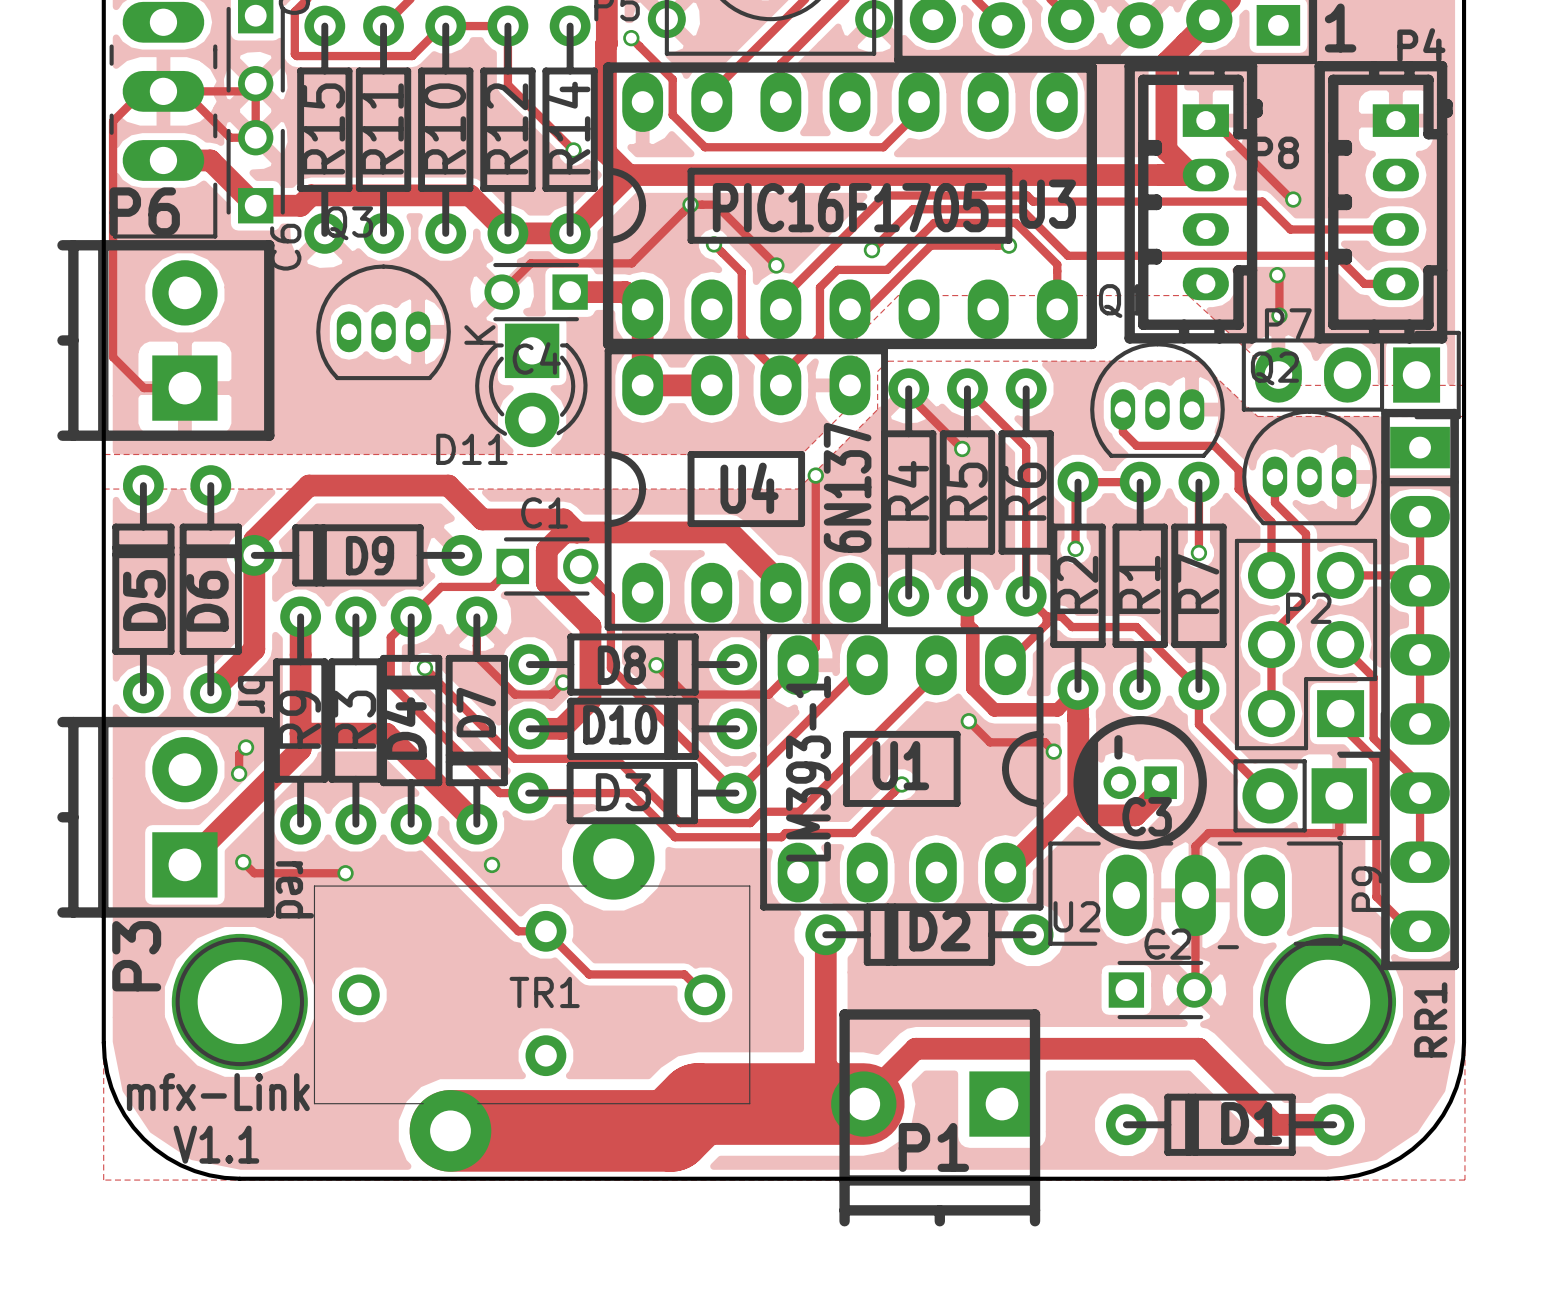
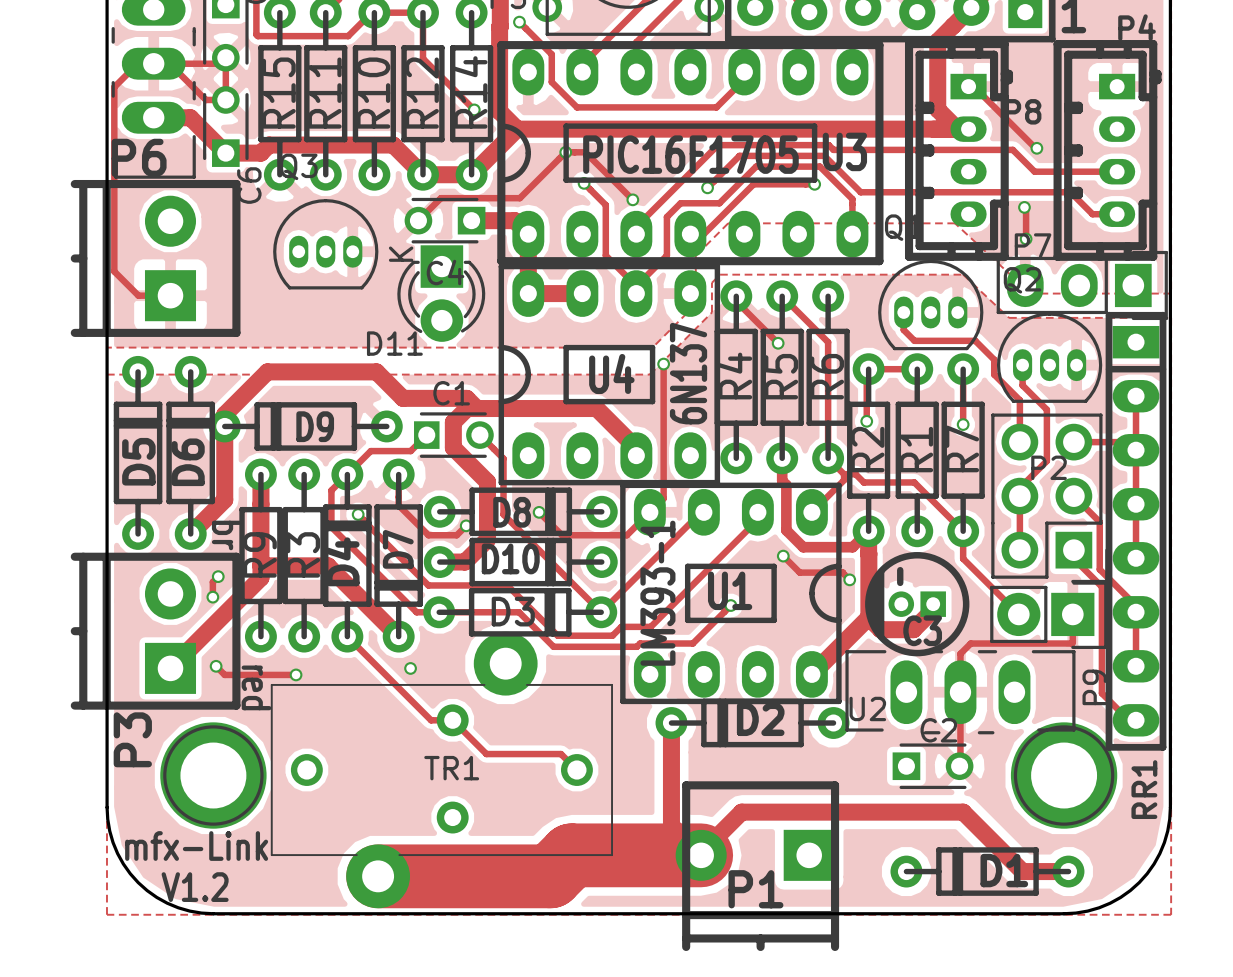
text: V1.1 (216, 1144) -> V1.2 (195, 887)

